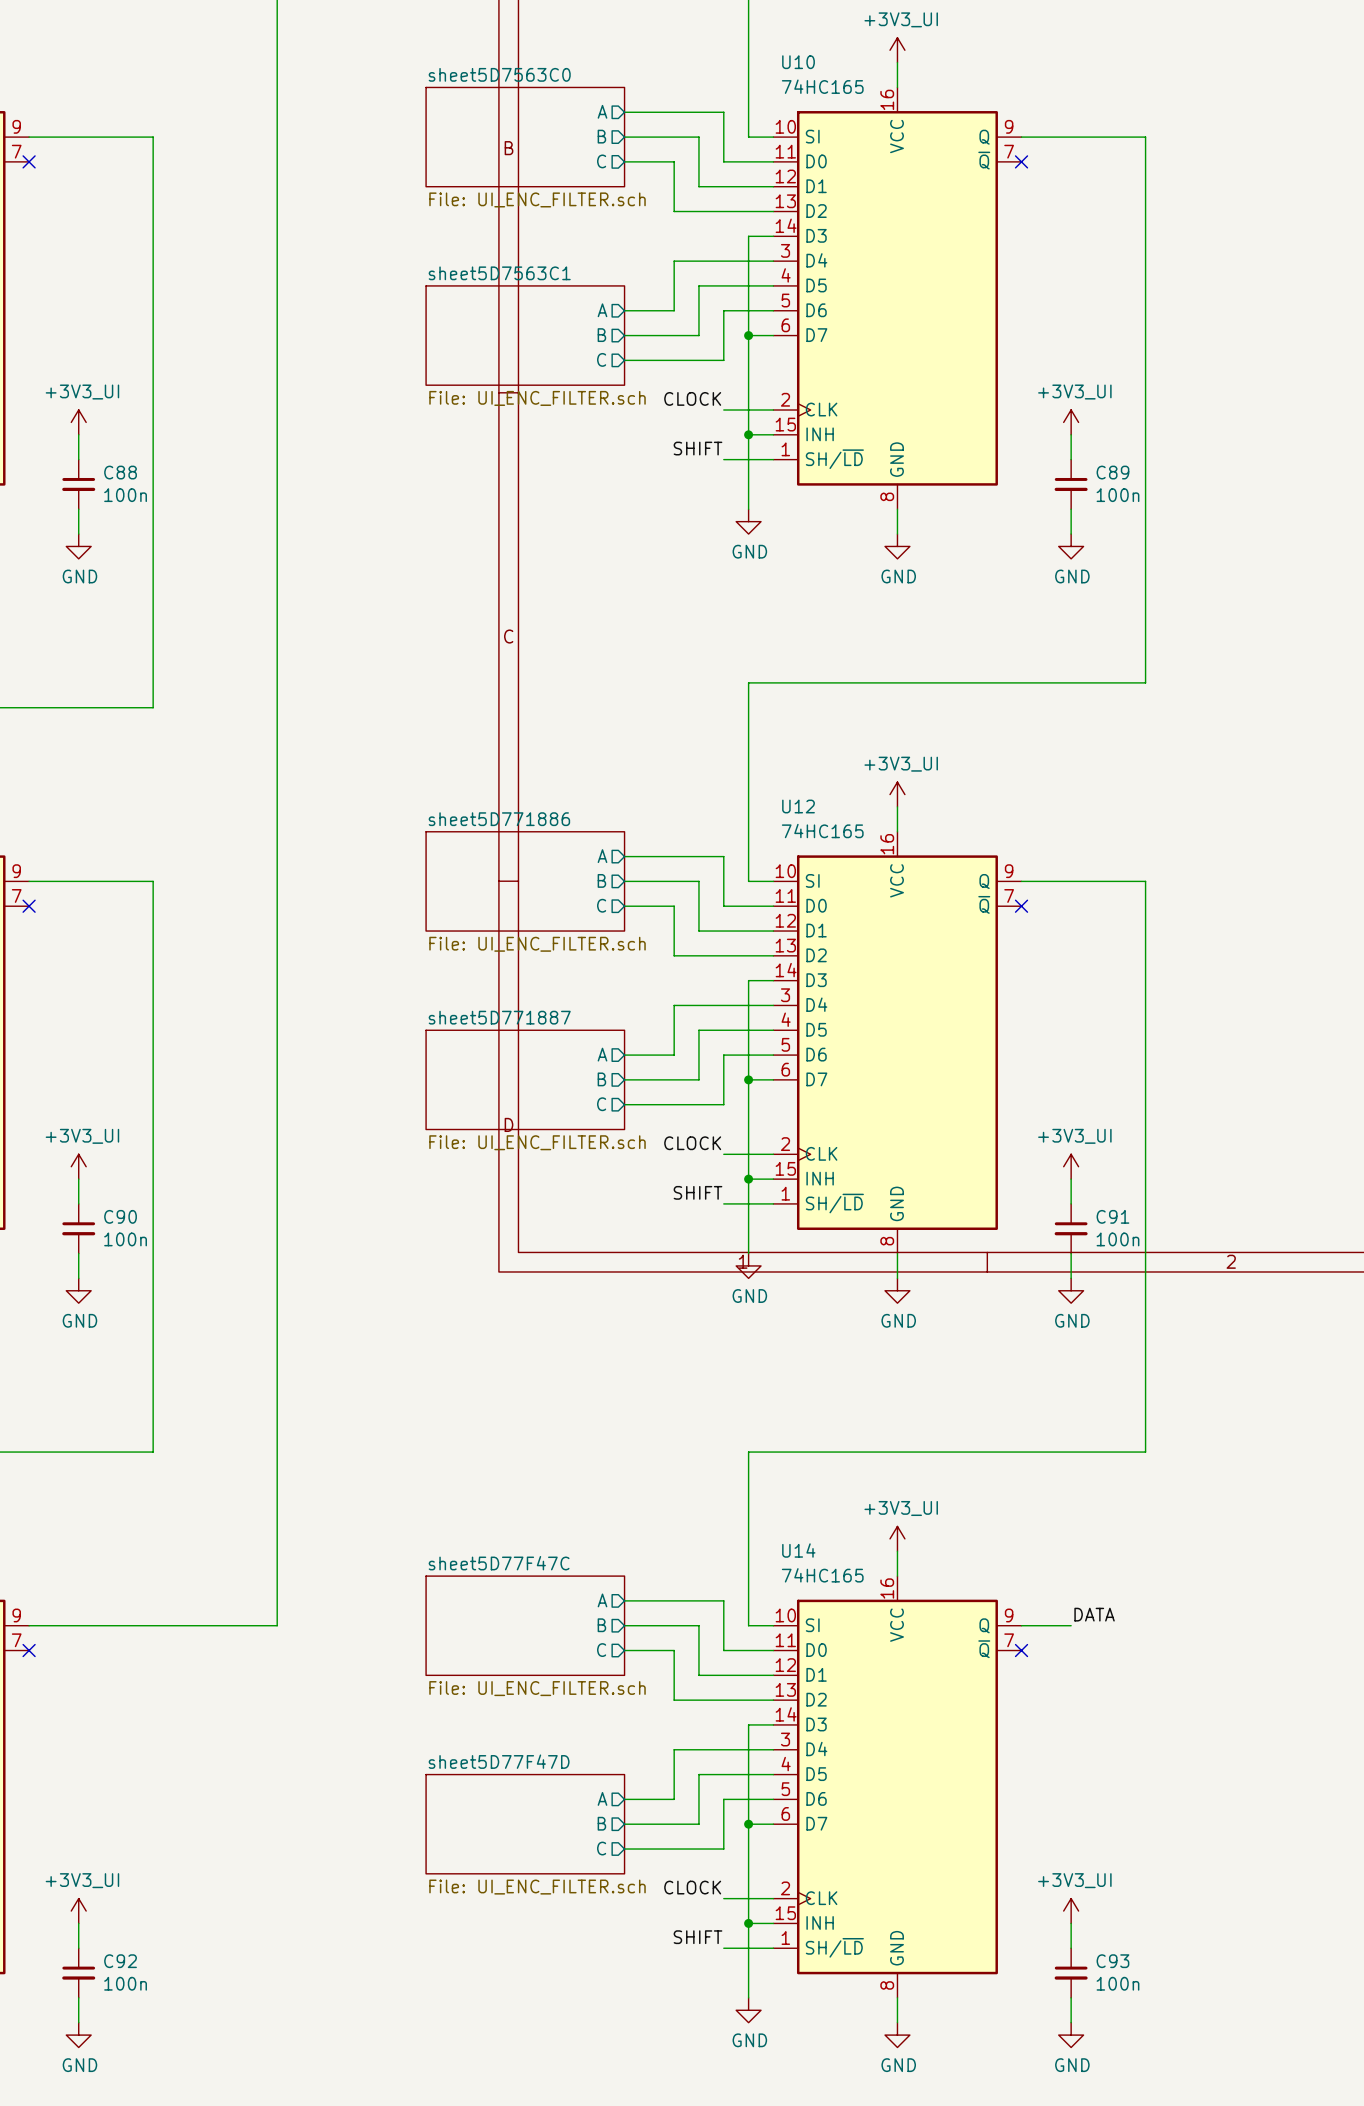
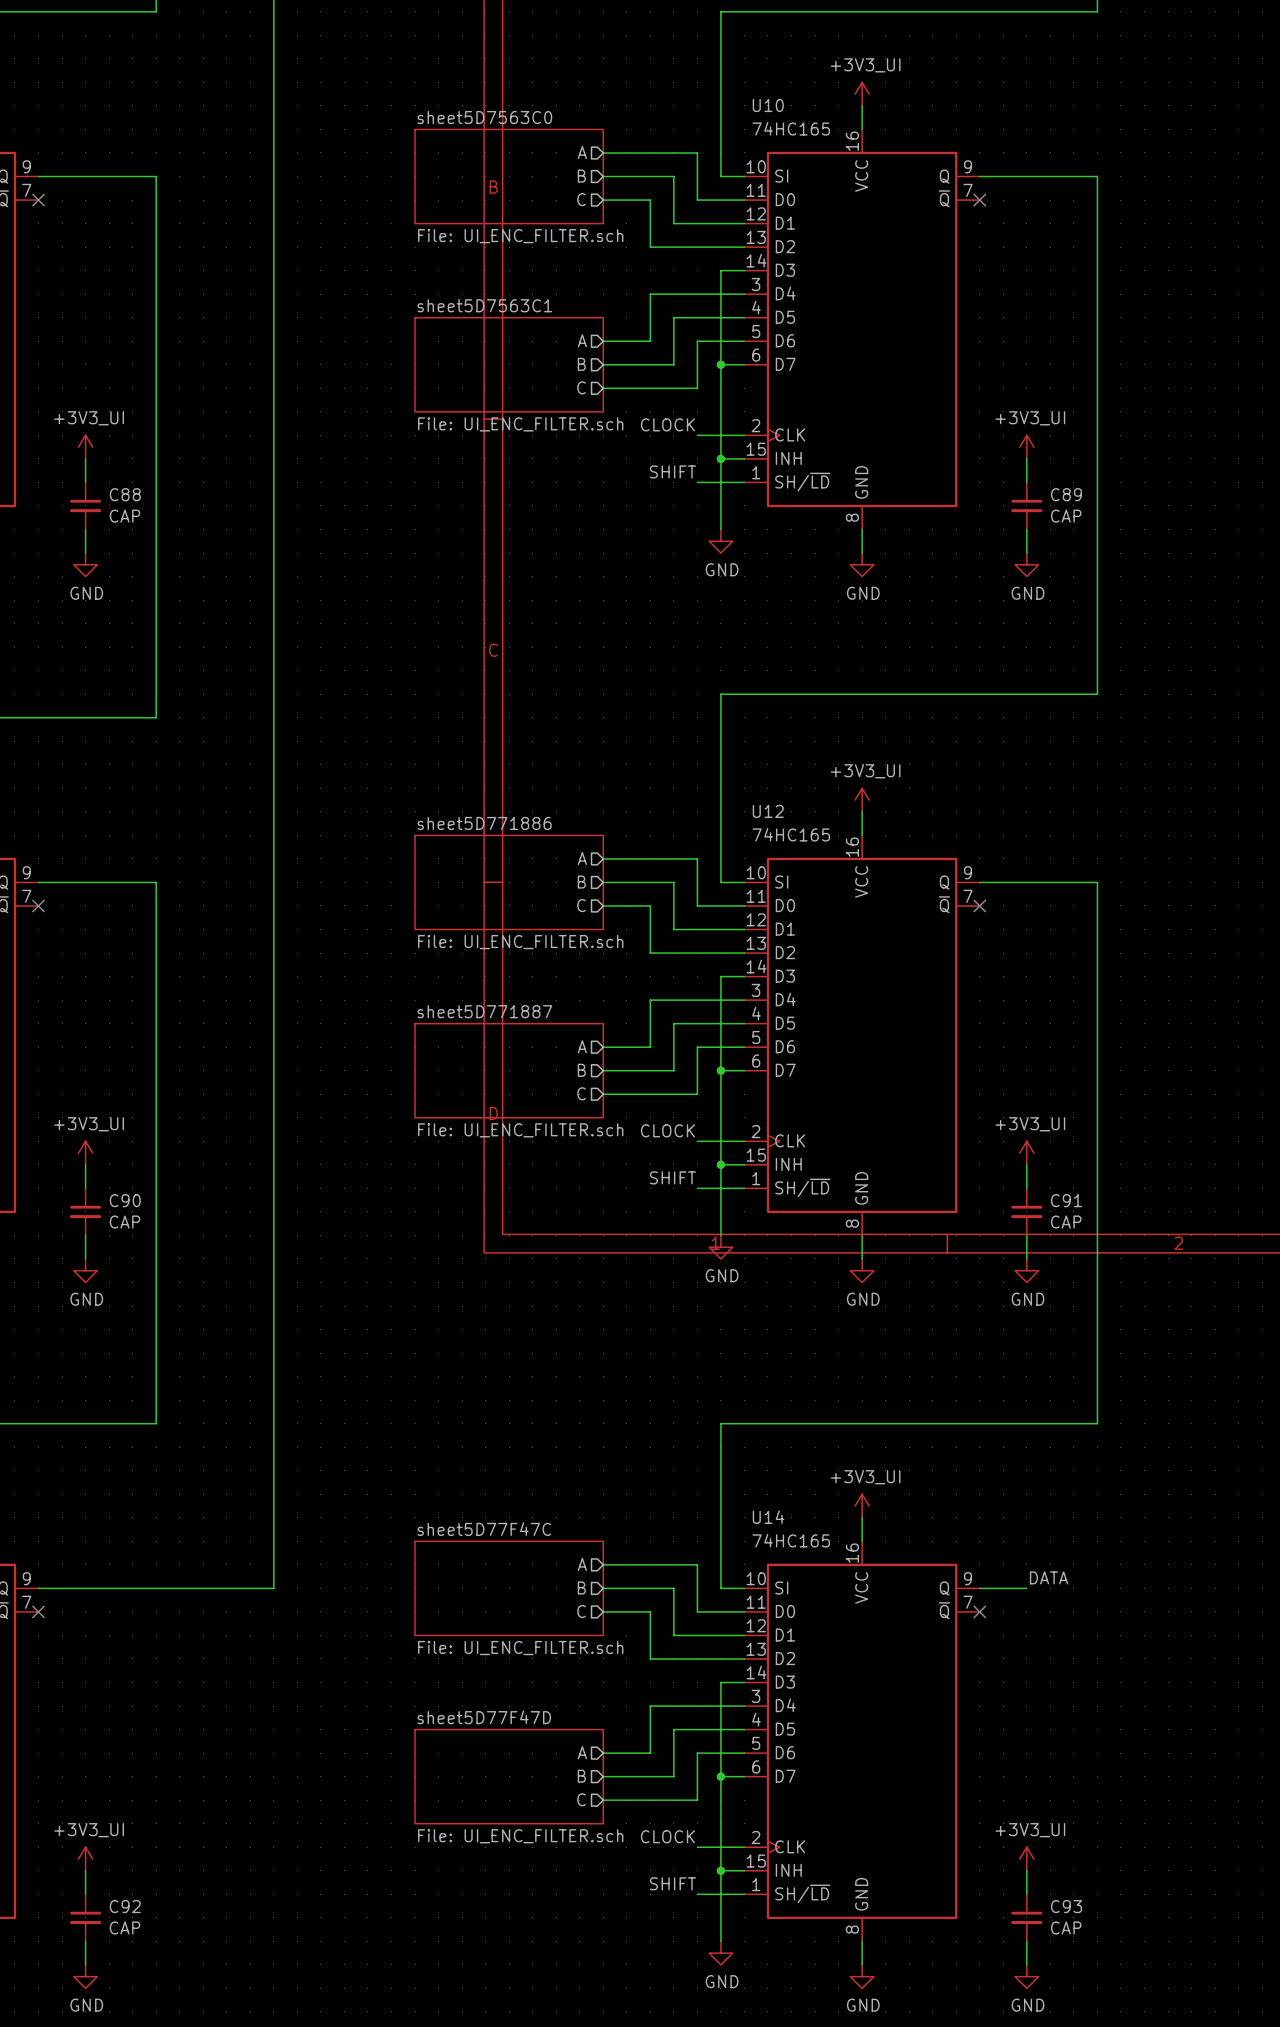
C88 value: 100n (125, 495) -> CAP (124, 516)
C89 value: 100n (1117, 495) -> CAP (1066, 516)
C90 value: 100n (125, 1239) -> CAP (124, 1222)
C91 value: 100n (1117, 1239) -> CAP (1066, 1222)
C92 value: 100n (125, 1983) -> CAP (124, 1927)
C93 value: 100n (1117, 1983) -> CAP (1066, 1927)

